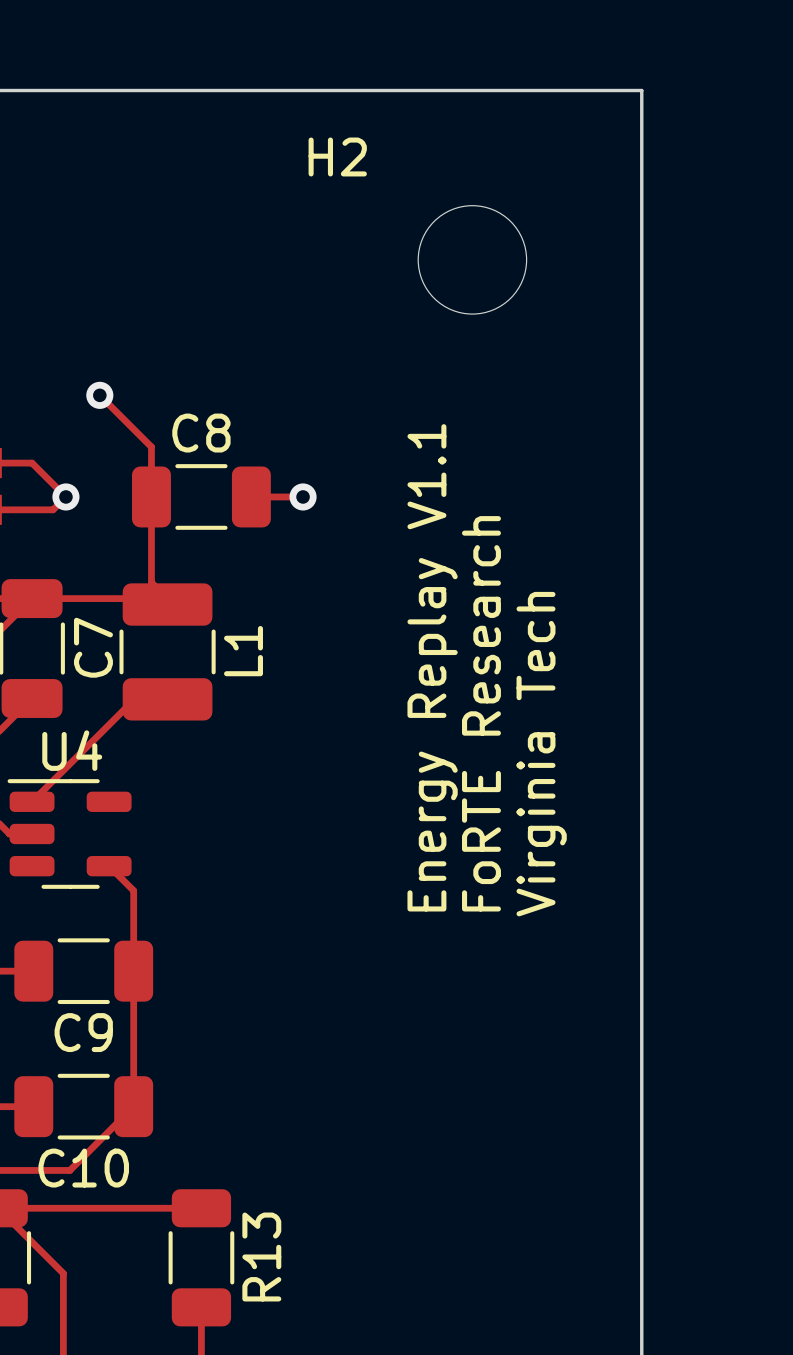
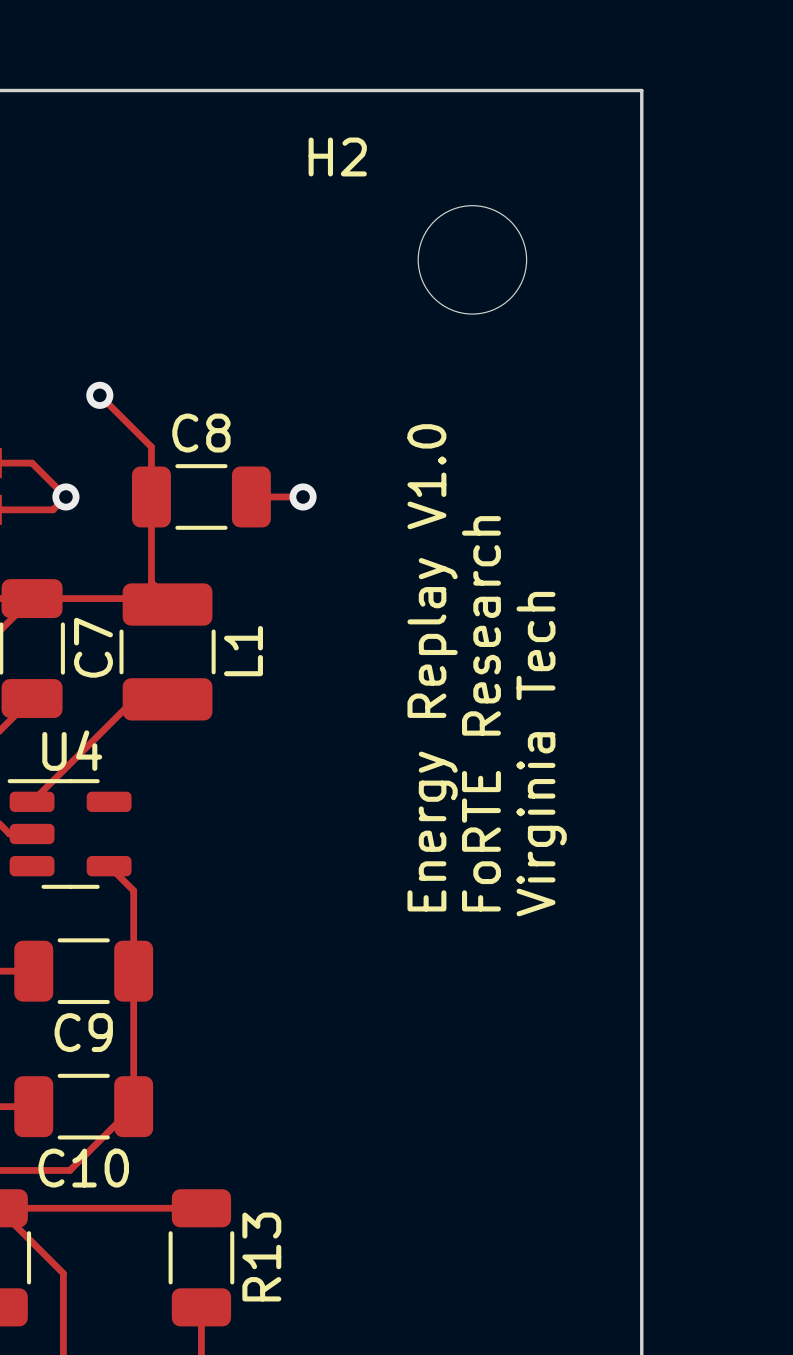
text: Energy Replay V1.1 (432, 667) -> Energy Replay V1.0 (432, 667)

